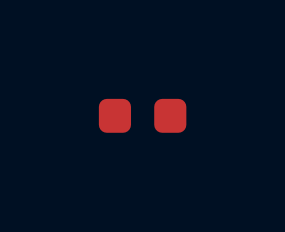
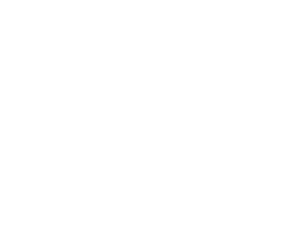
part: (142, 115) -> none

